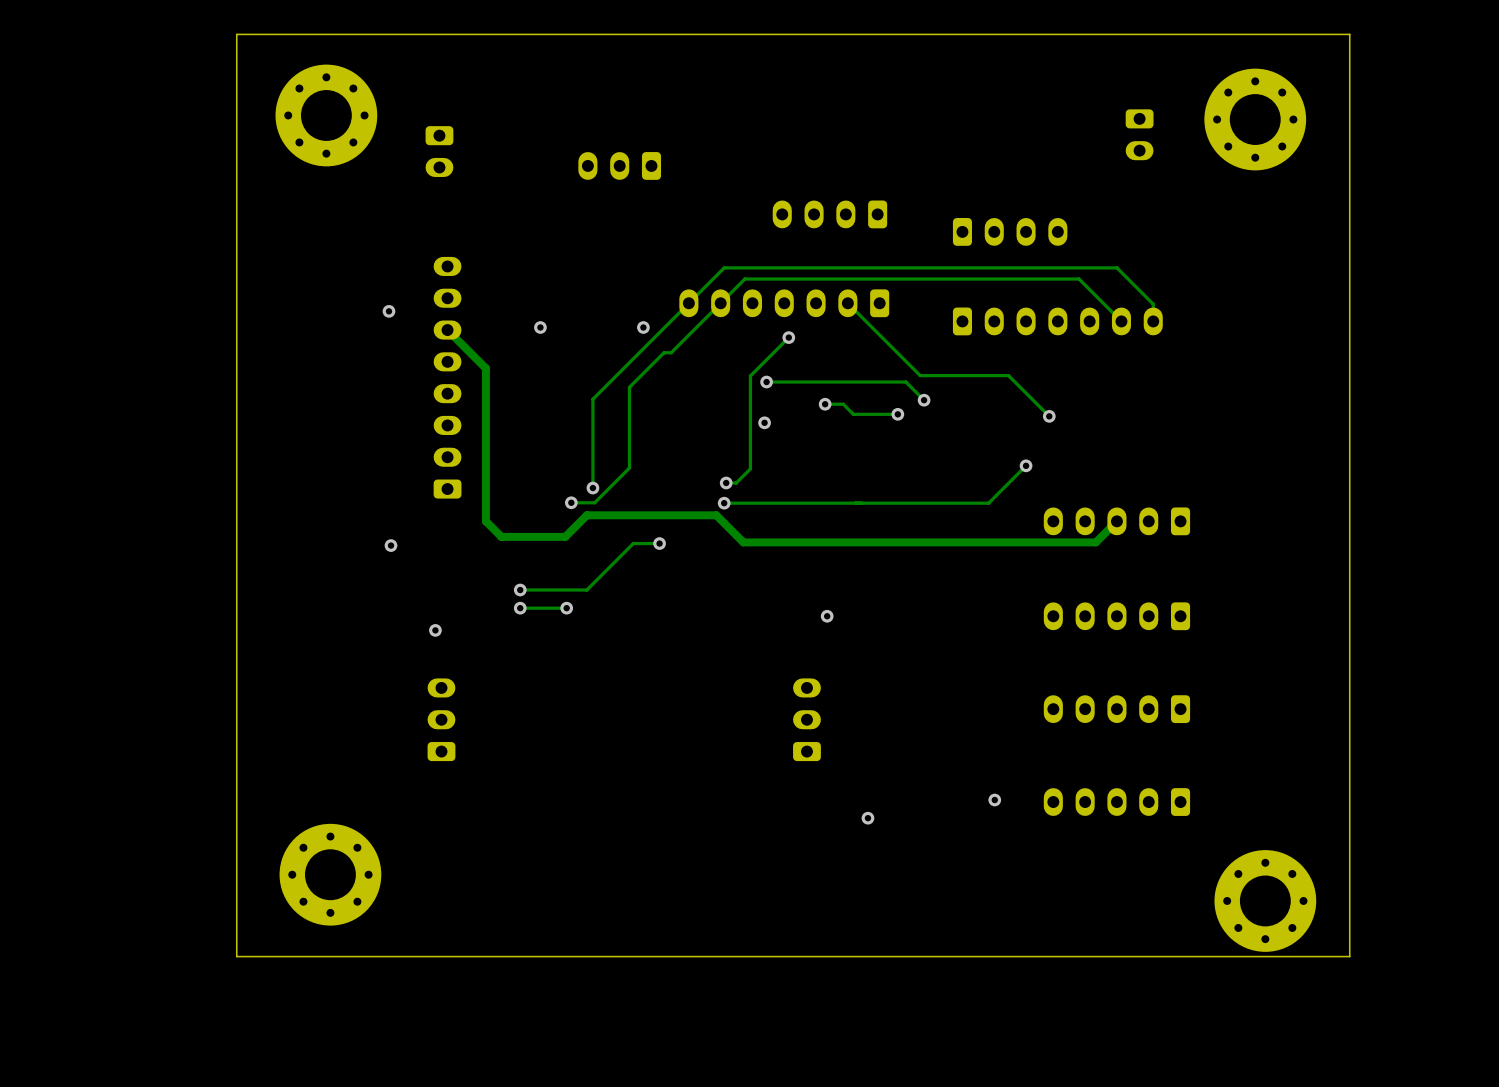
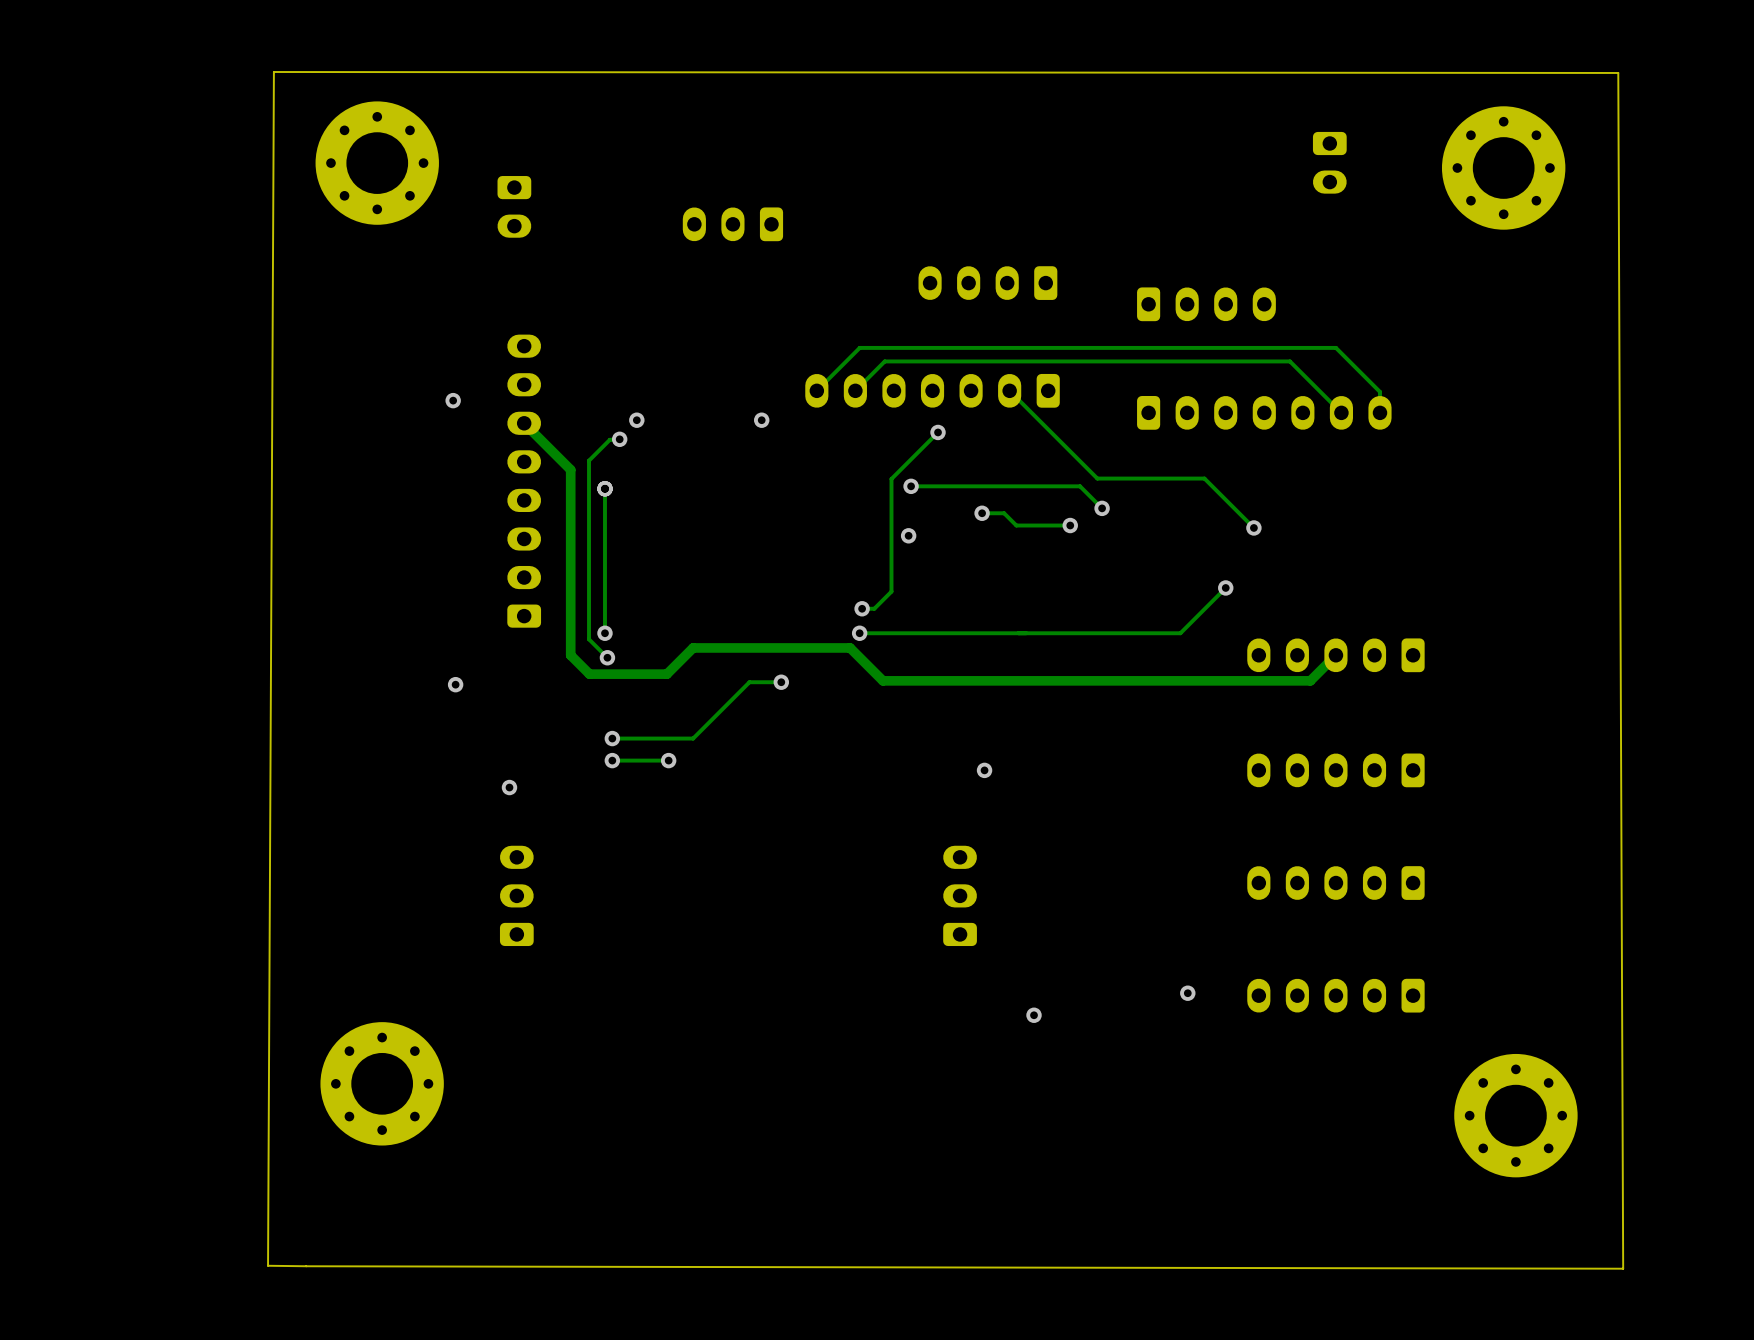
board edge: (1349, 34) (236, 34) (236, 956) (1349, 956) (1349, 34) -> (273, 72) (1618, 72) (1623, 1268) (268, 1265) (273, 72)
part position: (1139, 134) -> (1329, 162)
track: (688, 303) (592, 399) (592, 488) -> none
track: (720, 303) (671, 352) (664, 352) (629, 387) (629, 467) (594, 502) (571, 502) -> none
via: none -> (619, 439)
track: none -> (622, 439) (609, 439) (589, 460) (589, 639) (607, 657)
track: none -> (604, 488) (604, 633)
via: none -> (604, 488)
via: (592, 488) -> none
via: (571, 502) -> none
via: none -> (604, 633)
via: none -> (607, 657)

